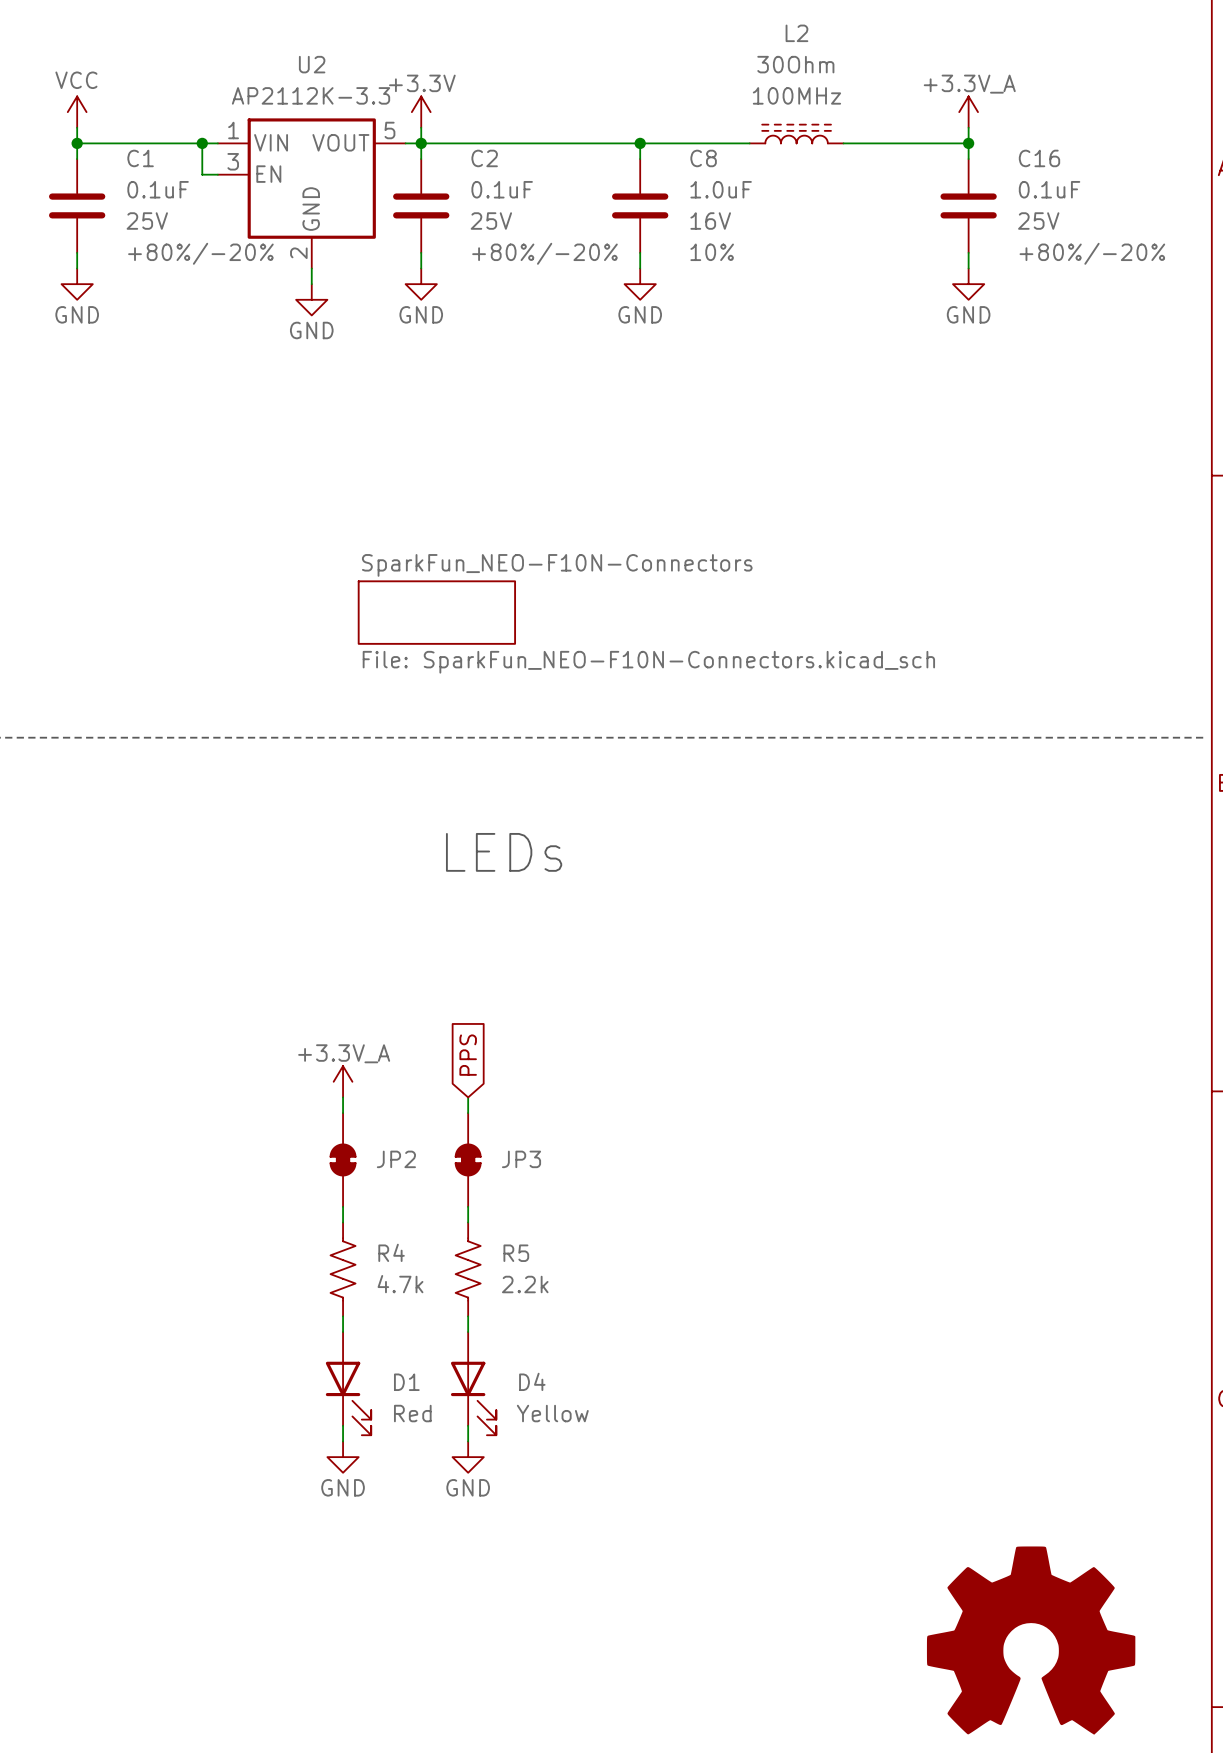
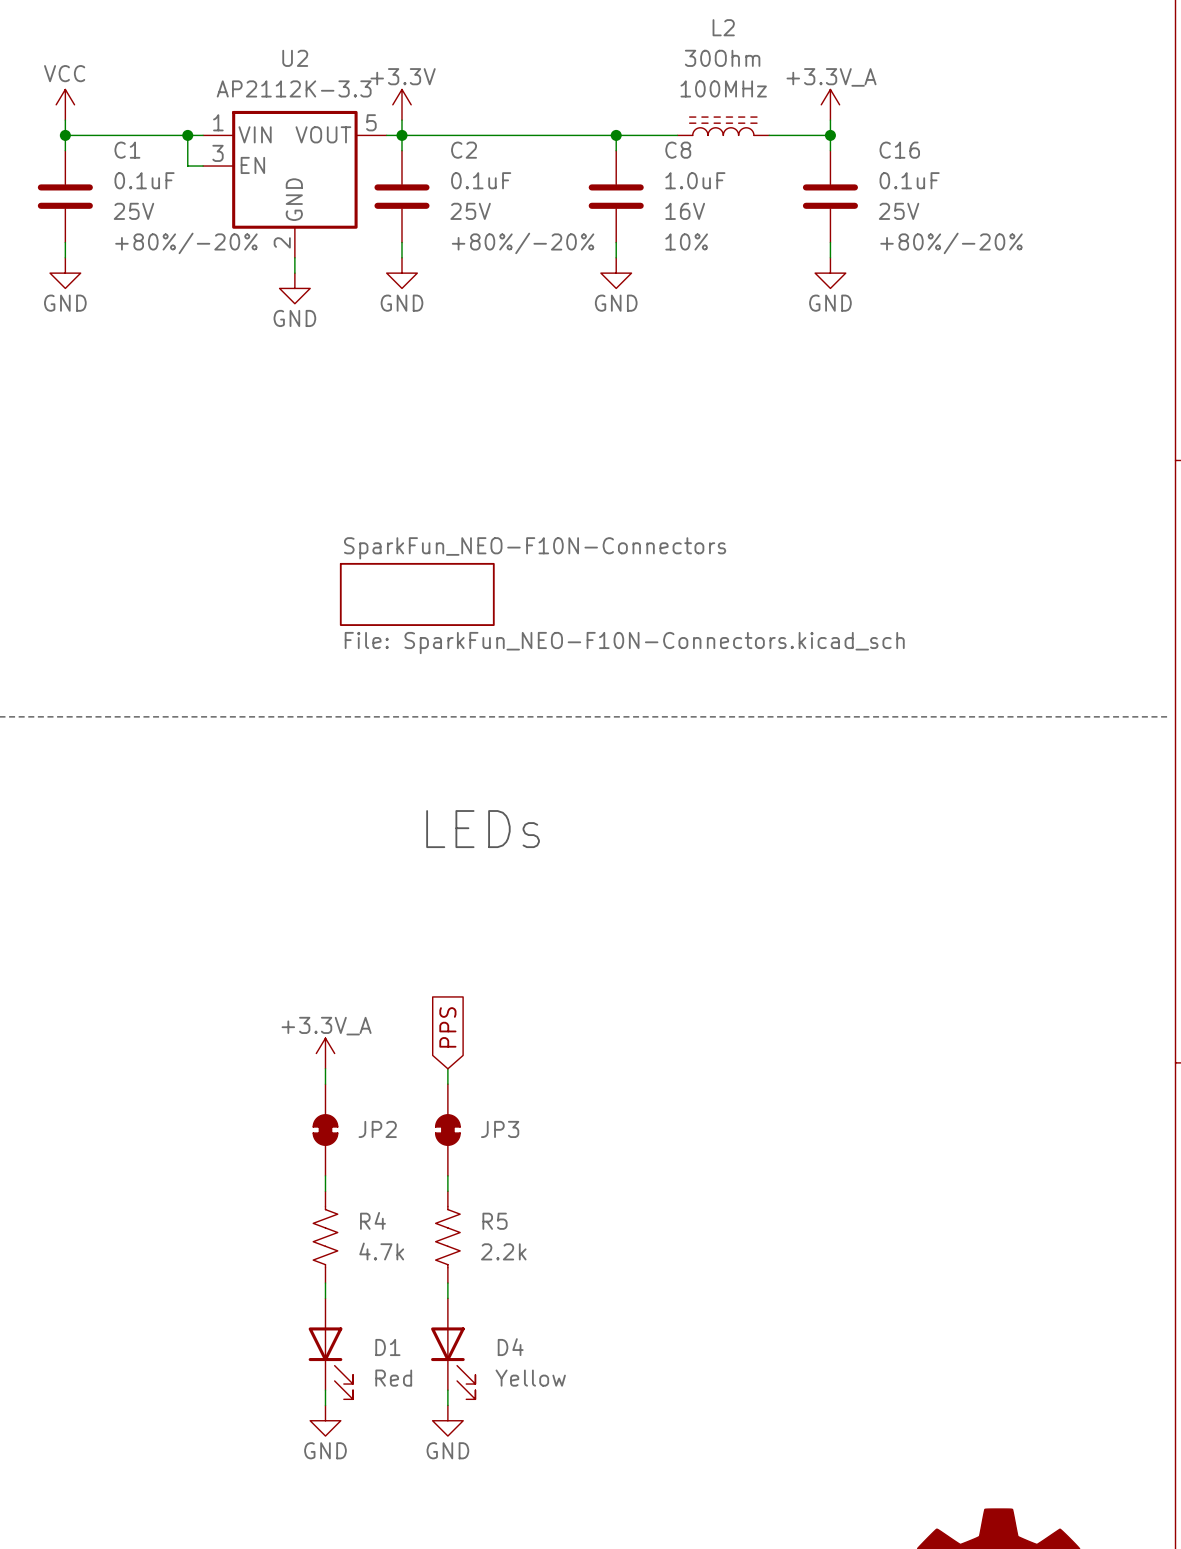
power symbol position: +3.3V_A (968, 112) -> +3.3V_A (830, 104)
wire: (968, 127) (968, 159) -> (830, 120) (830, 150)
L2 position: (796, 134) -> (723, 126)
wire: (702, 143) (749, 143) -> (769, 135) (815, 135)
wire: (859, 143) (968, 143) -> none
junction: none -> (830, 135)
junction: (968, 143) -> none
C16 position: (968, 205) -> (830, 196)
wire: (968, 252) (968, 268) -> (830, 242) (830, 257)
power symbol position: GND (968, 284) -> GND (830, 273)

